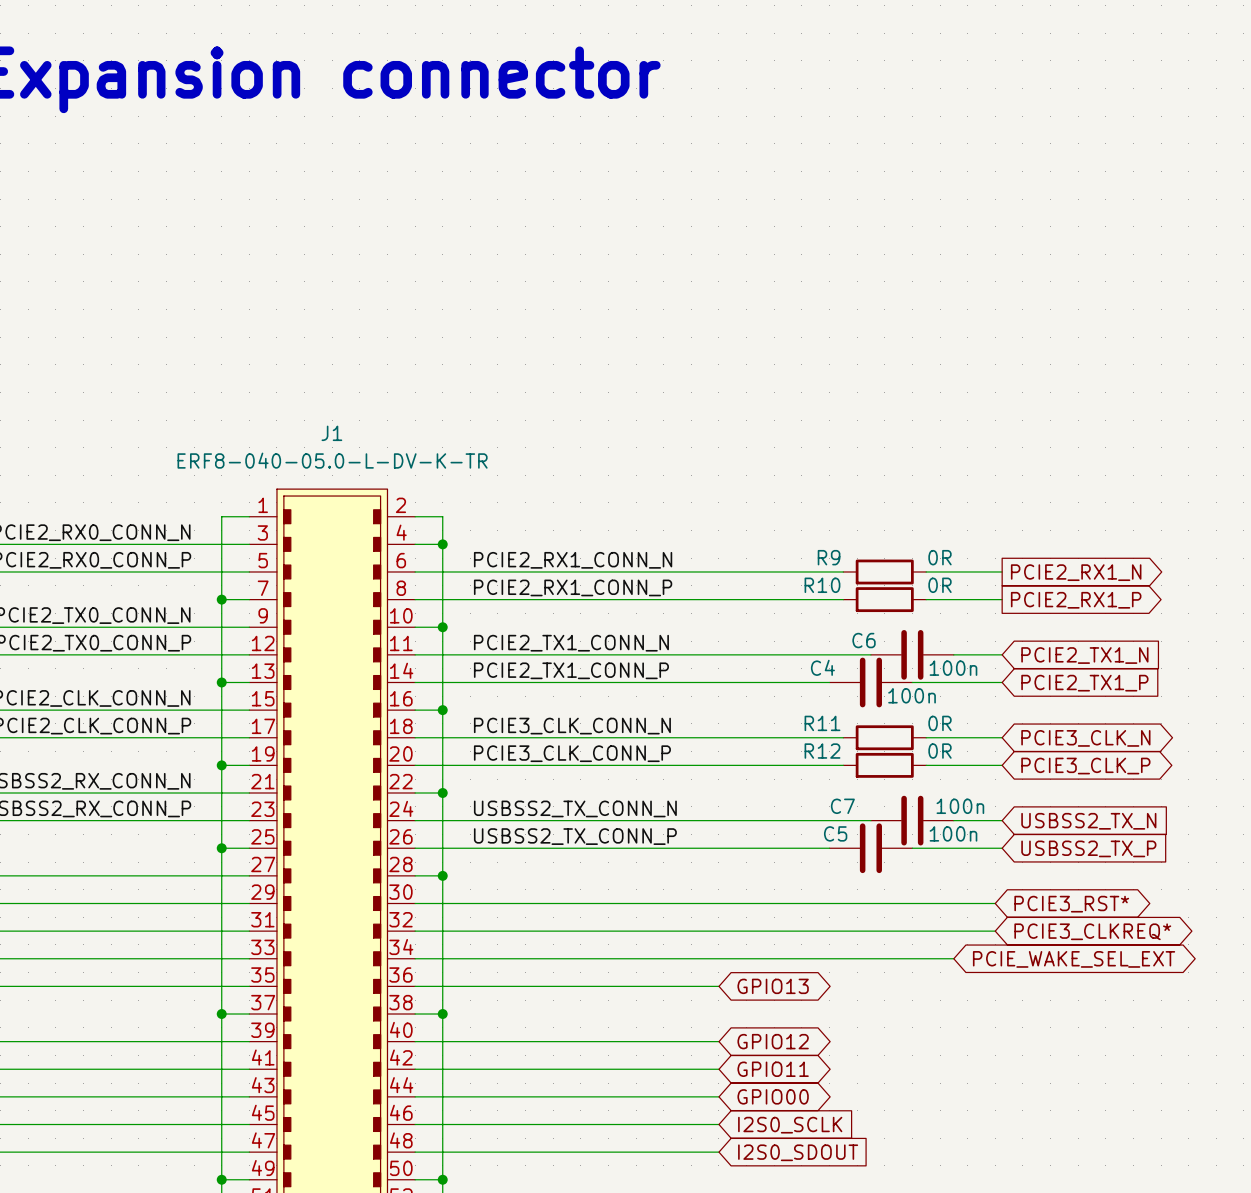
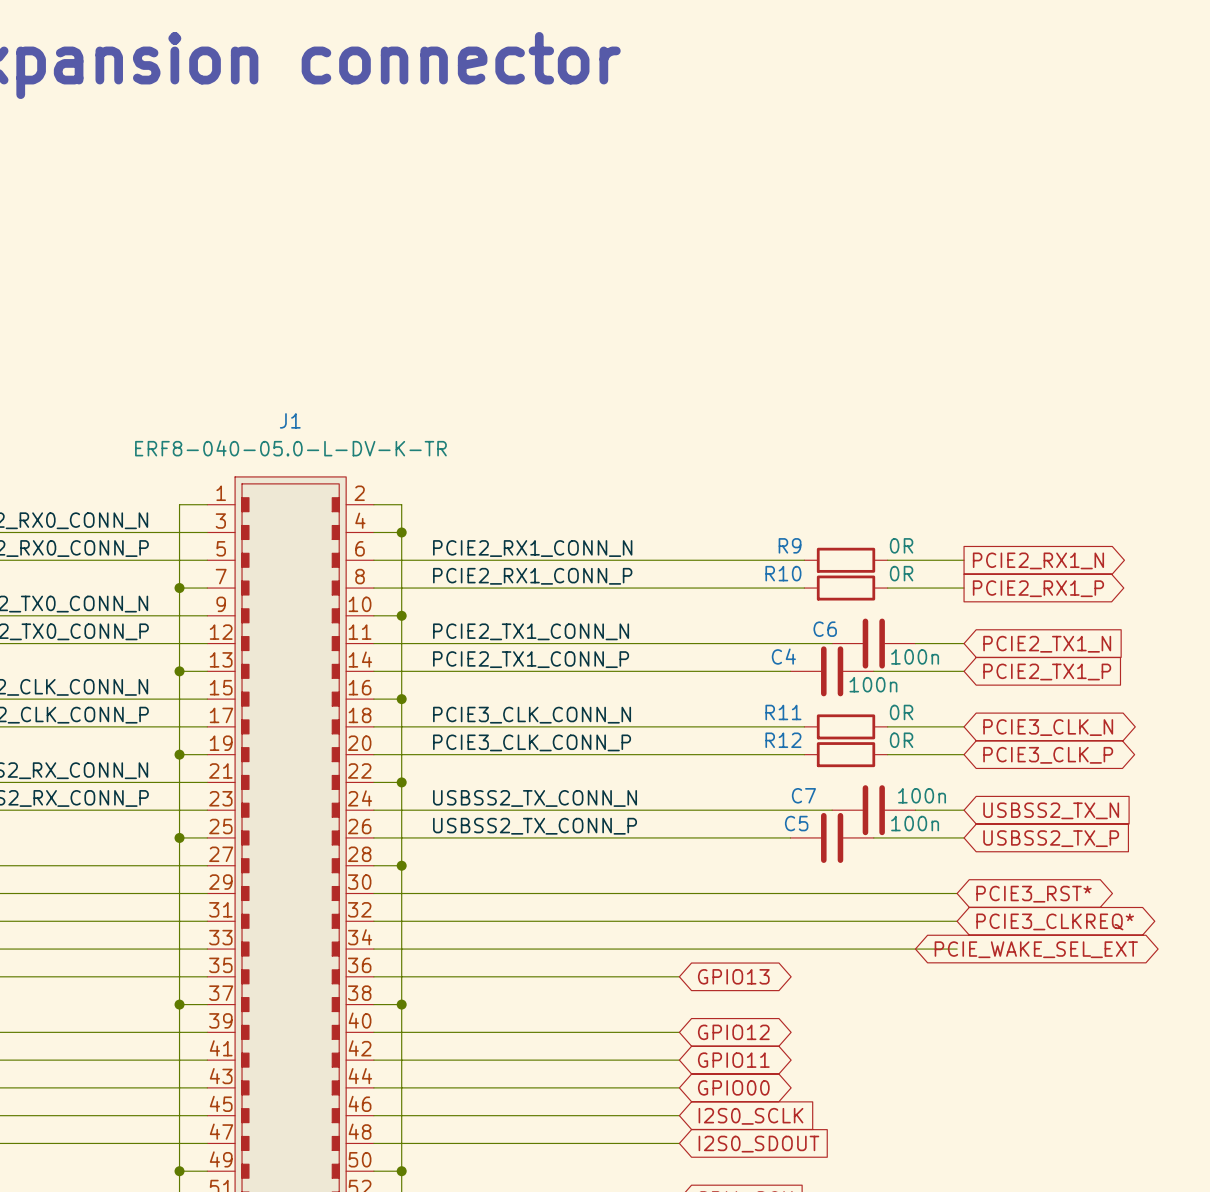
wire: none -> (915, 949) (957, 949)

